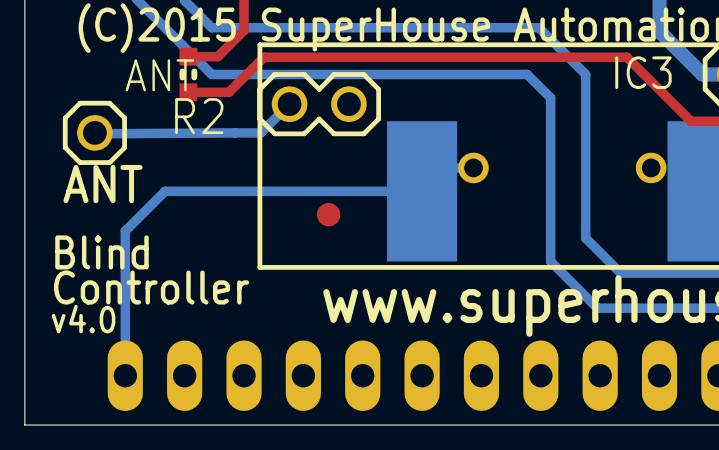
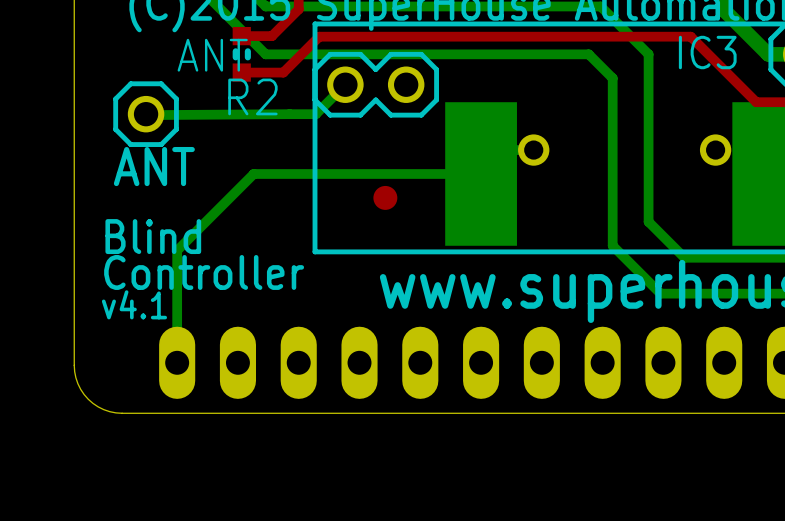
bottom track: (200, 191) (165, 191) (125, 231) (125, 266) -> (253, 173) (177, 250)
text: v4.0 (83, 319) -> v4.1 (134, 304)
board edge: (24, 378) (24, 425) (71, 425) -> (74, 365) (77, 383) (88, 399) (103, 409) (122, 413)

